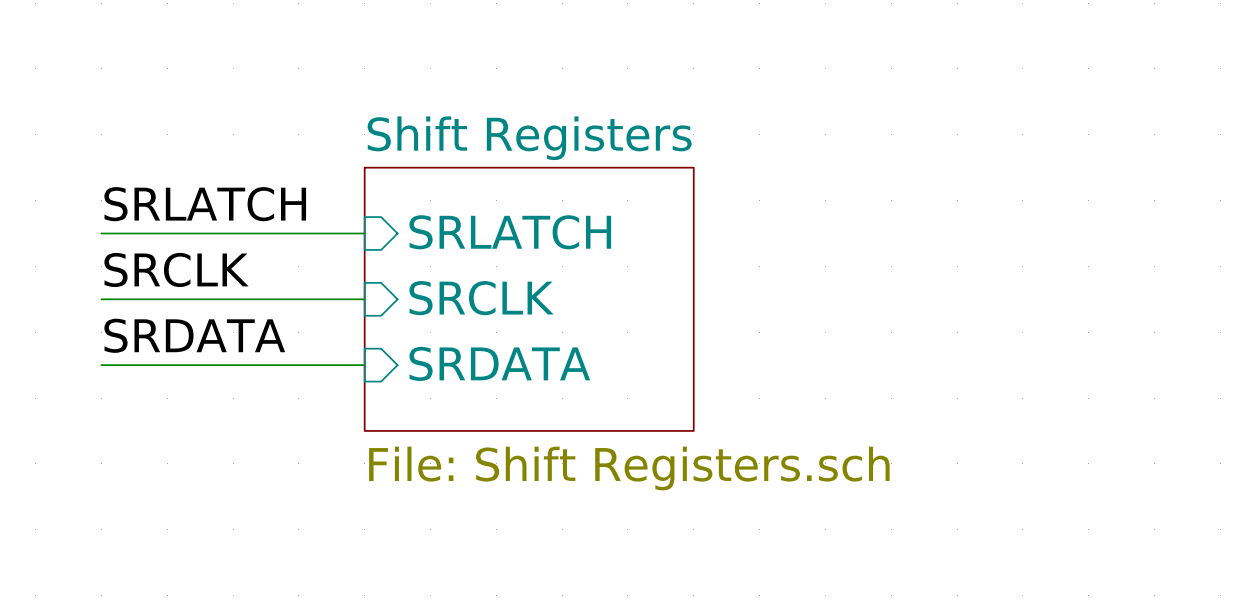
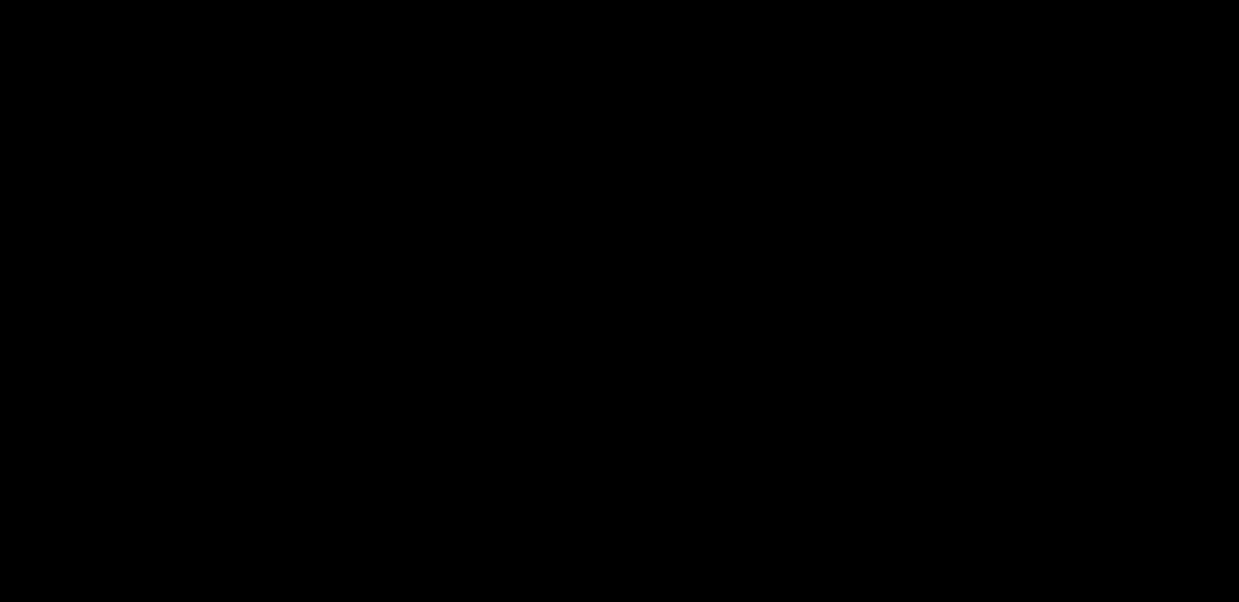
label: SRLATCH (205, 204) -> none
sheet pin: SRLATCH (510, 232) -> none
wire: (101, 233) (364, 233) -> none
label: SRCLK (176, 269) -> none
sheet pin: SRCLK (481, 298) -> none
wire: (101, 299) (364, 299) -> none
sheet Shift Registers: File: Shift Registers.sch (529, 299) -> none
label: SRDATA (194, 335) -> none
sheet pin: SRDATA (499, 363) -> none
wire: (101, 365) (364, 365) -> none

